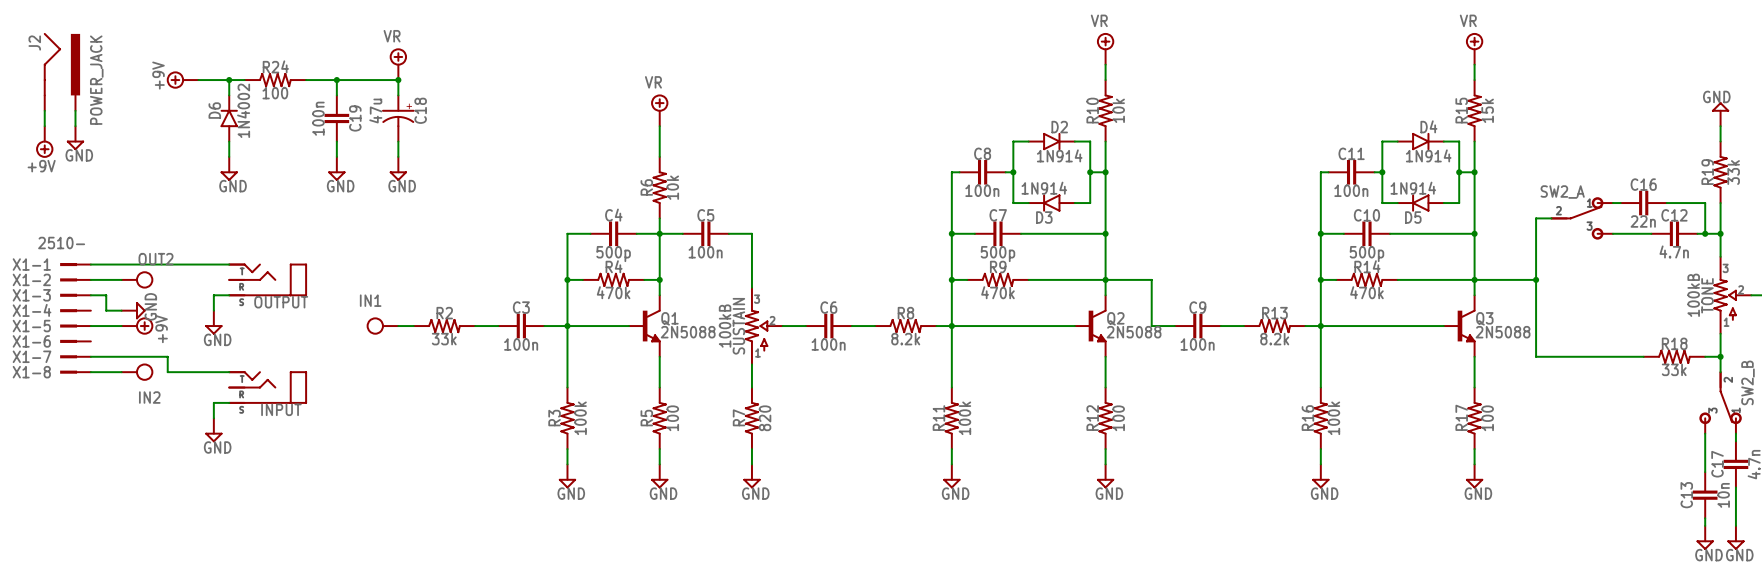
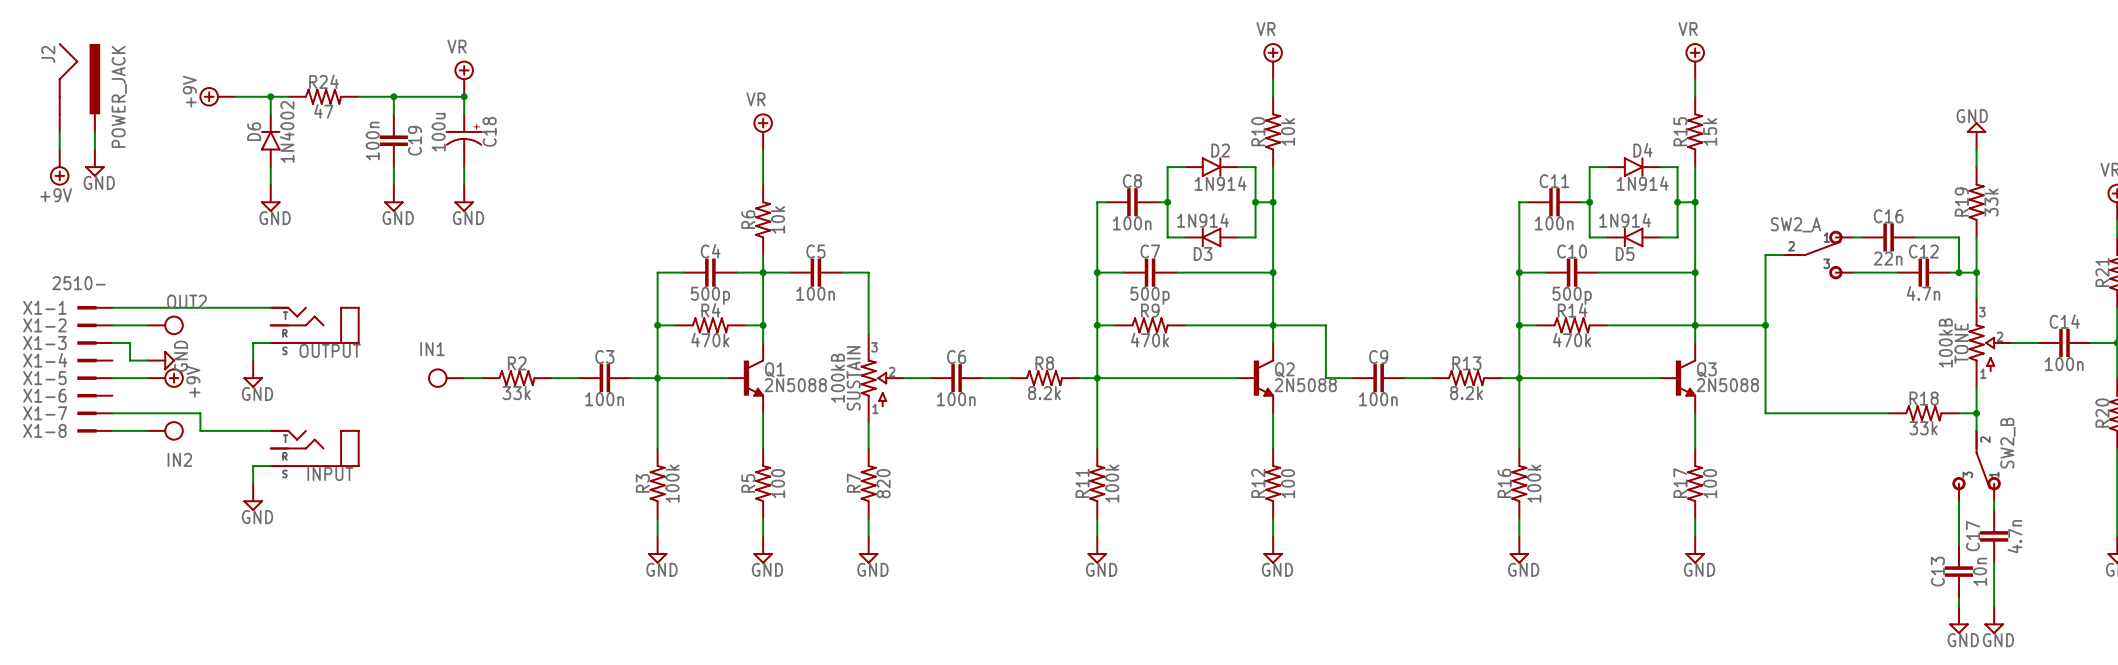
R24 value: 100 (275, 93) -> 47 (323, 111)
C18 value: 47u (375, 111) -> 100u (438, 132)

